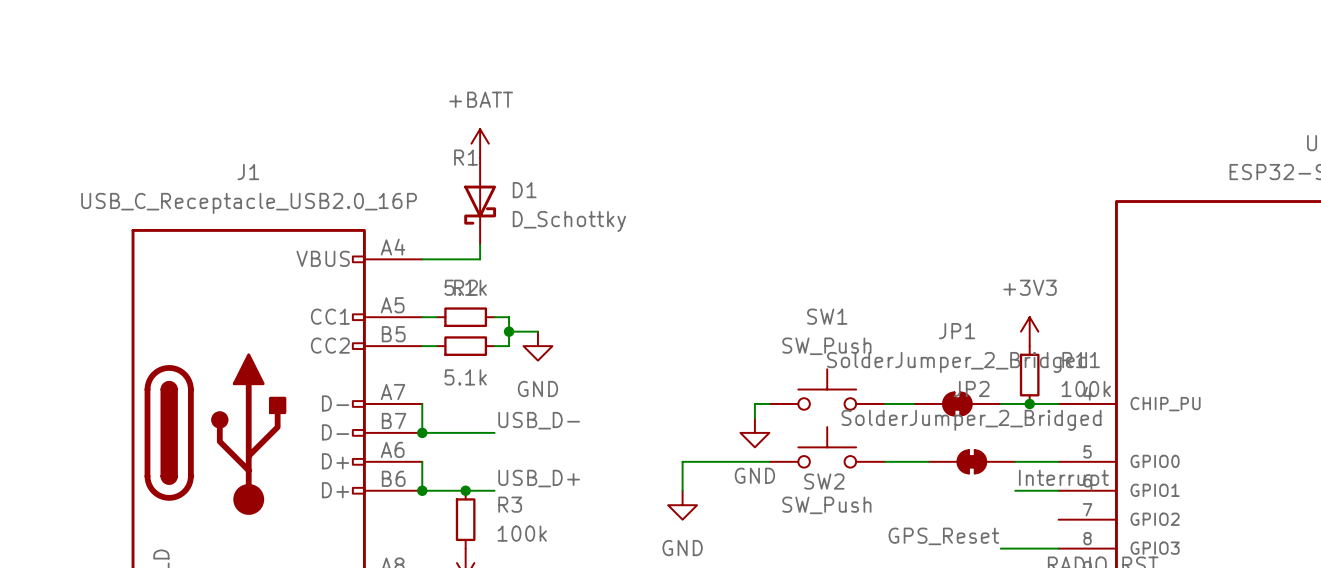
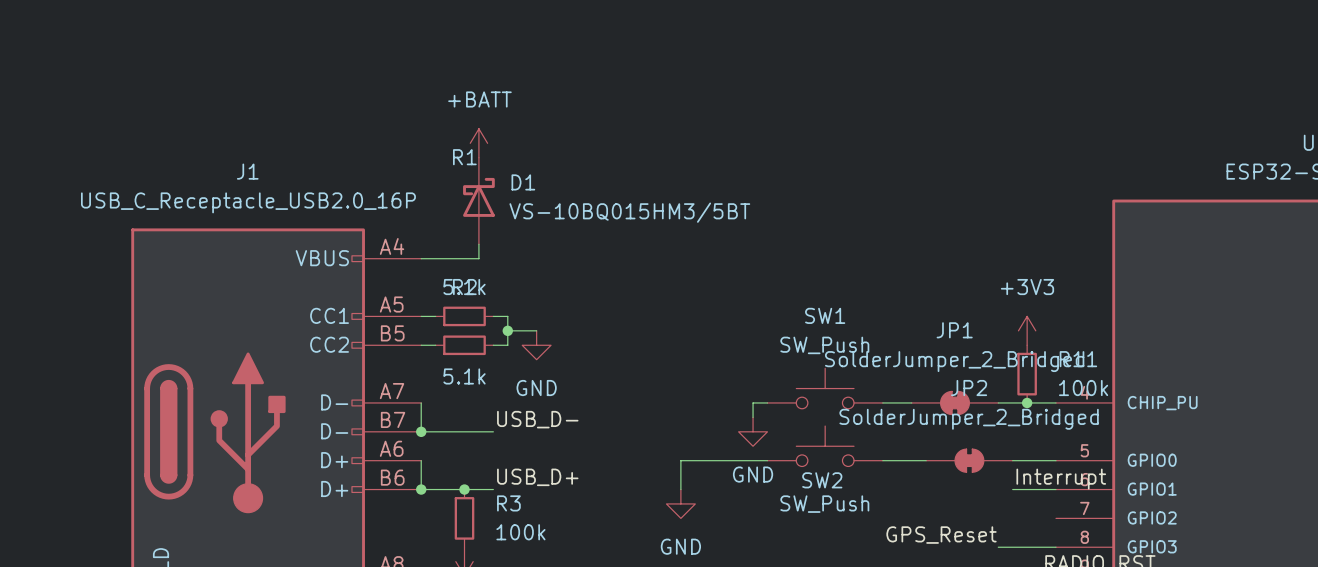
D1 rotation: 0° (480, 205) -> 180° (478, 197)
D1 value: D_Schottky (569, 221) -> VS-10BQ015HM3/5BT (629, 212)

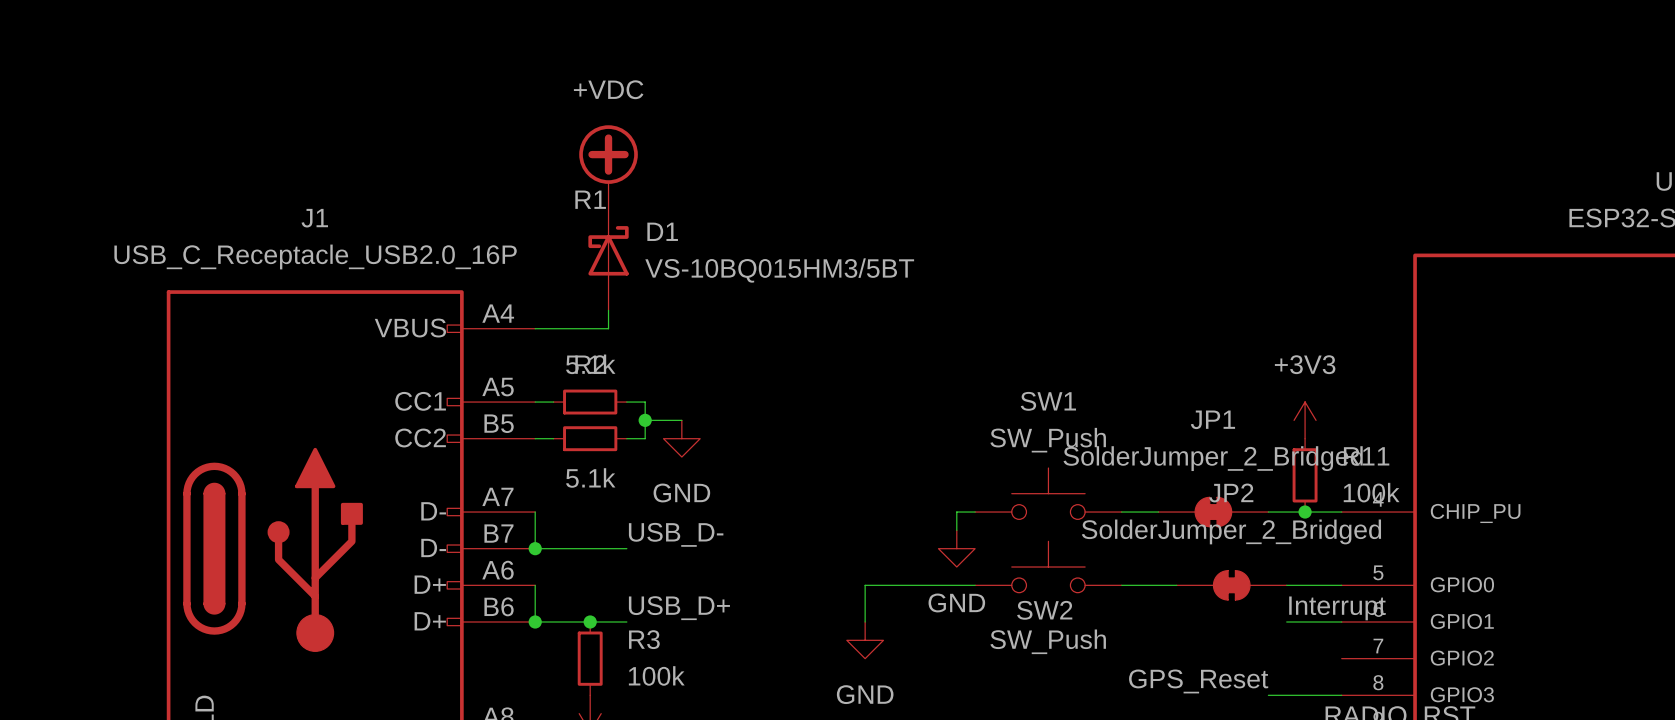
power symbol: none -> +VDC (608, 162)
power symbol: +BATT (478, 143) -> none

